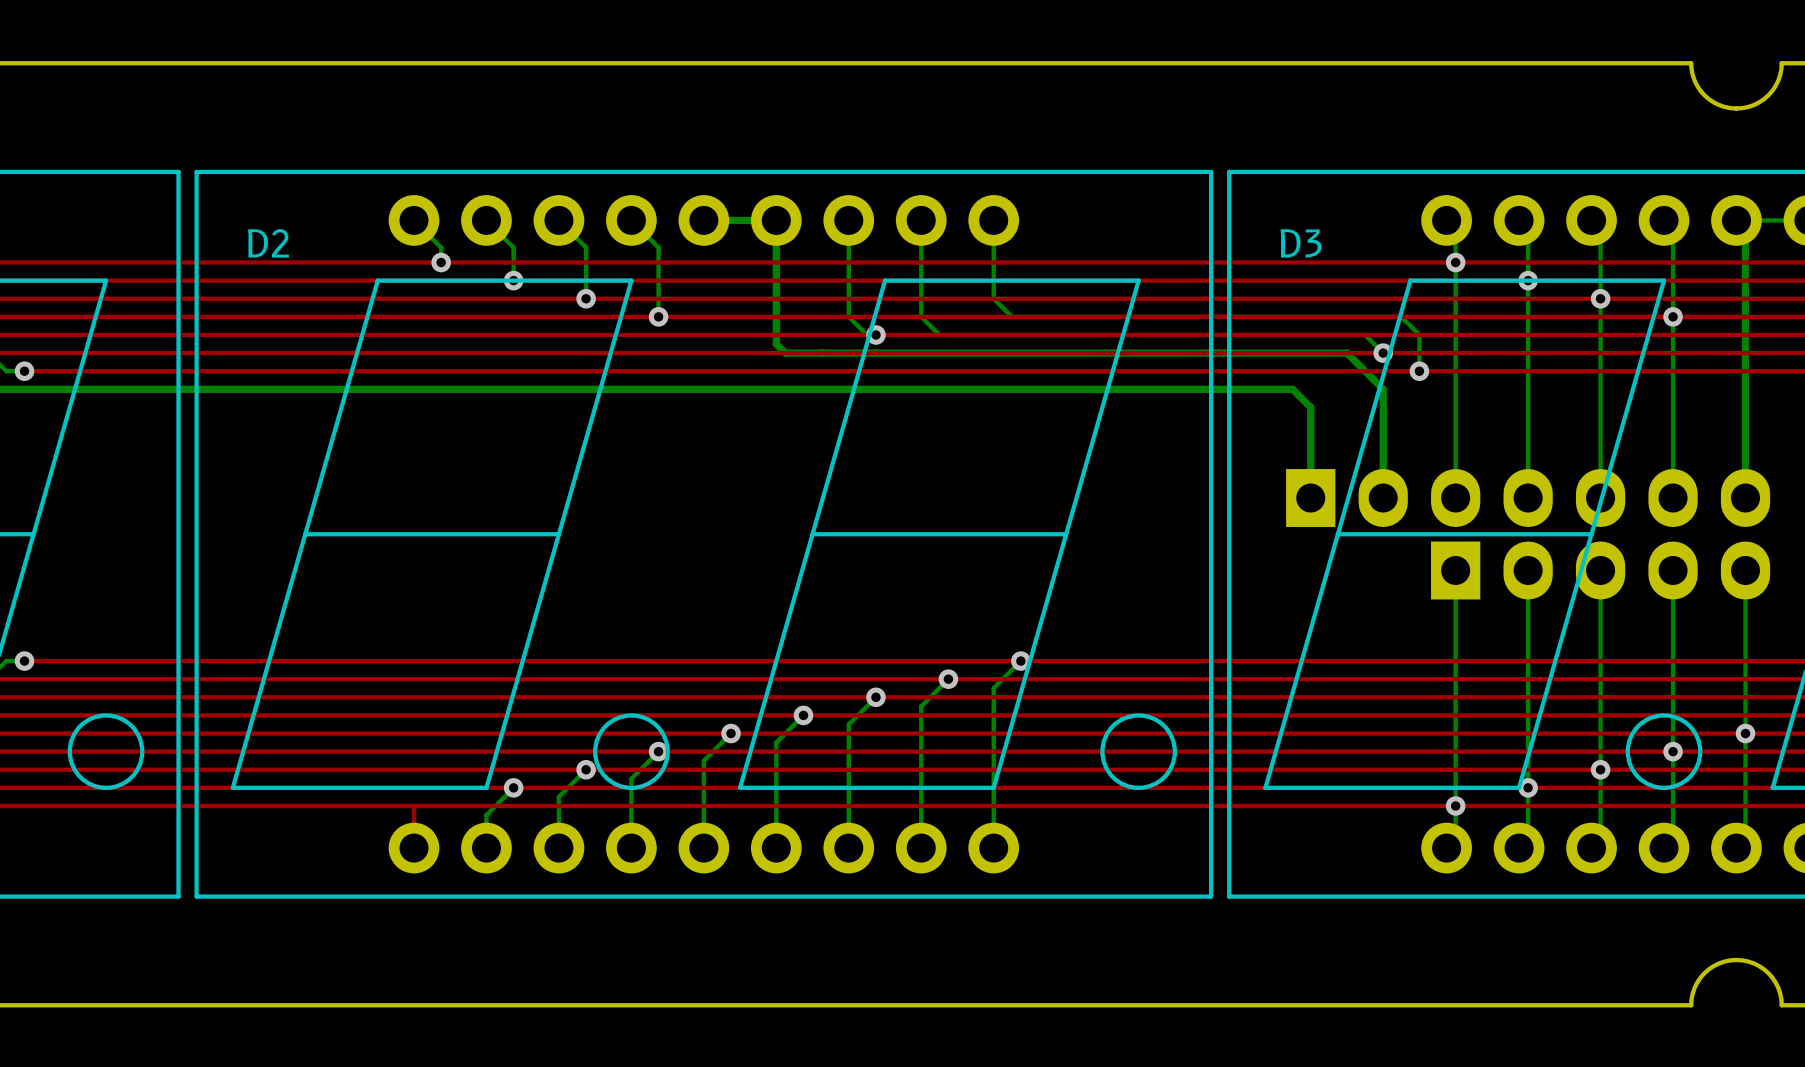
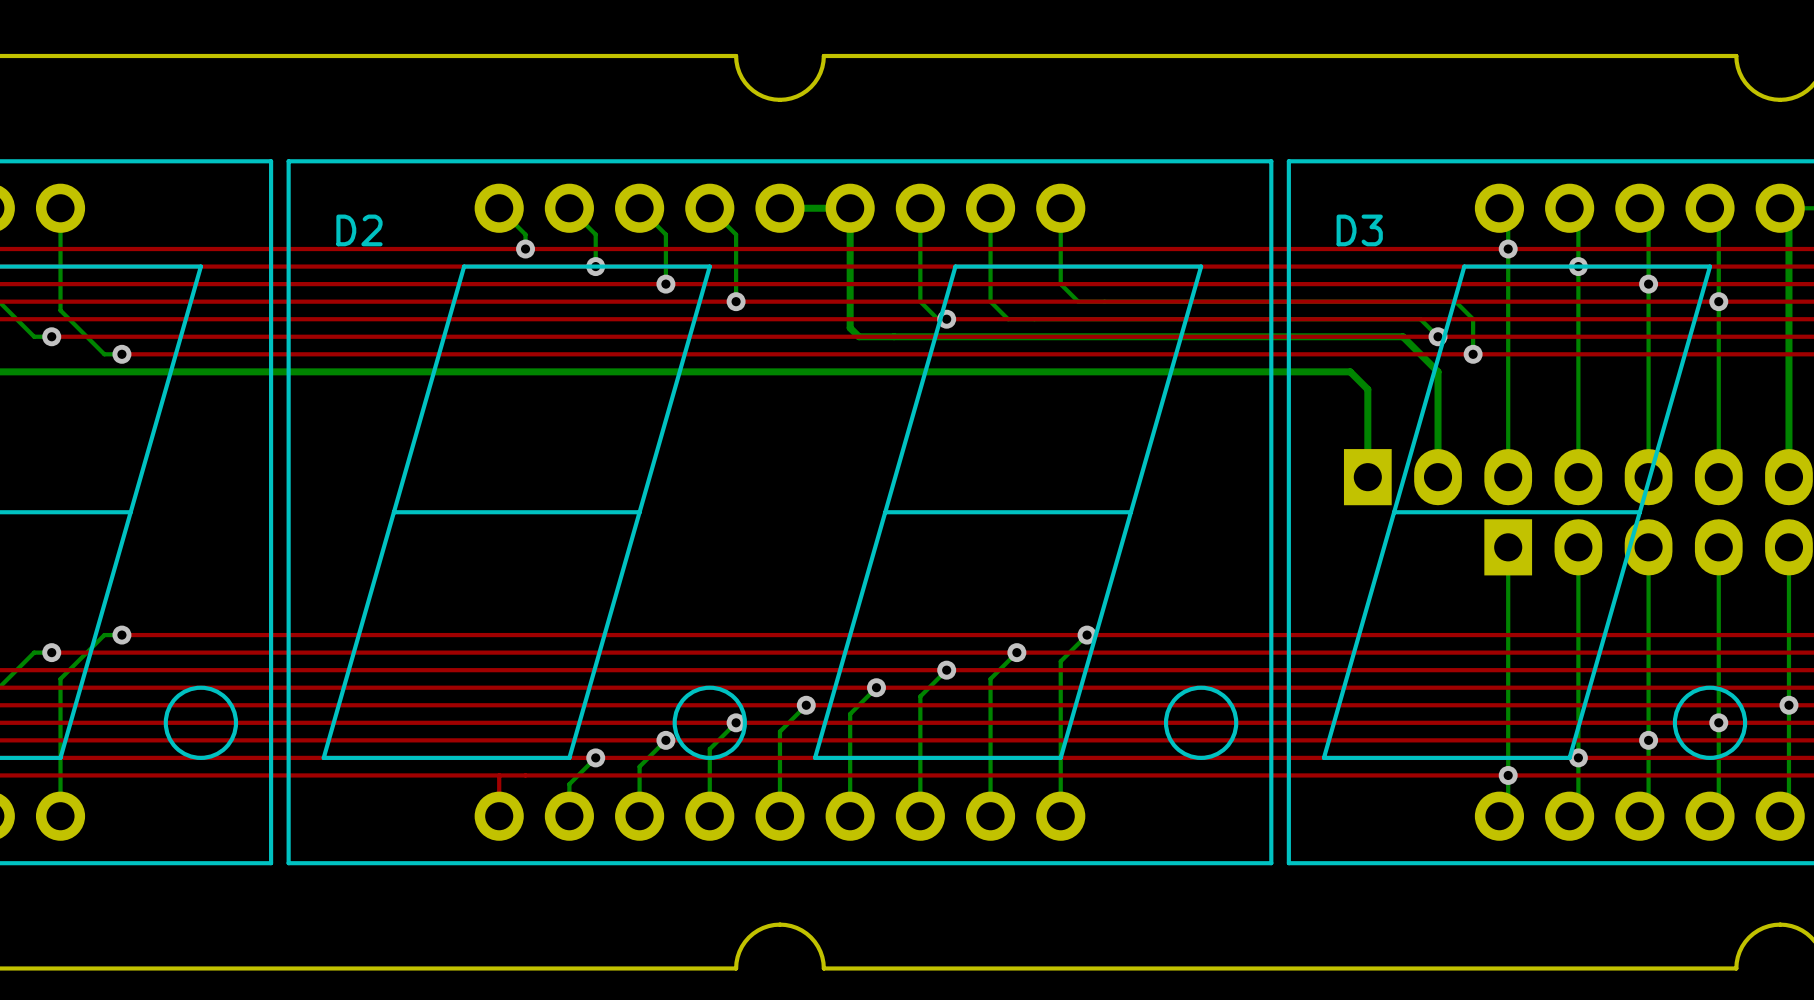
board edge: (658, 63) (749, 63) -> (736, 55) (739, 72) (748, 87) (763, 96) (779, 99) (796, 96) (810, 87) (820, 72) (823, 55)
board edge: (658, 1005) (749, 1005) -> (736, 968) (739, 951) (748, 937) (763, 927) (779, 924) (796, 927) (810, 937) (820, 951) (823, 968)

